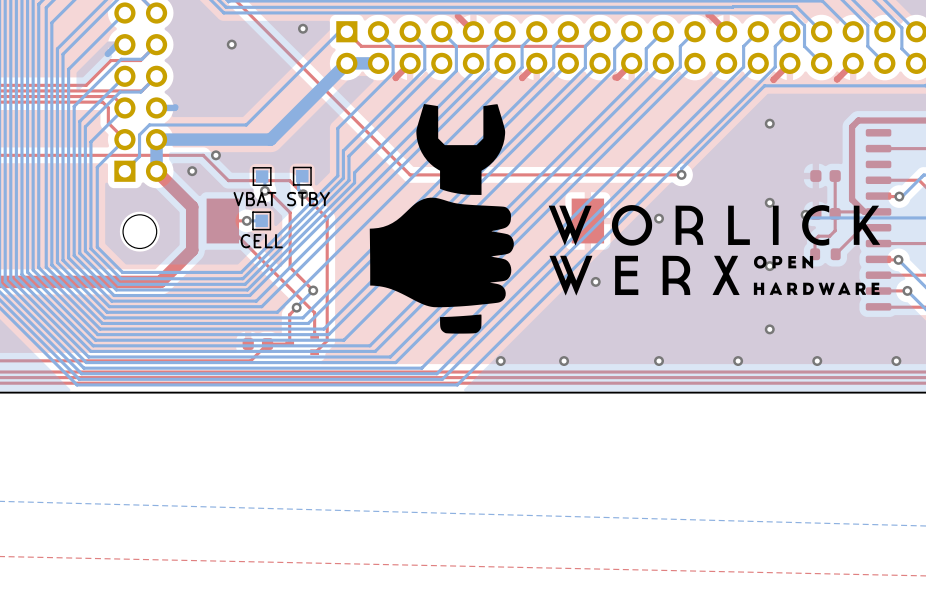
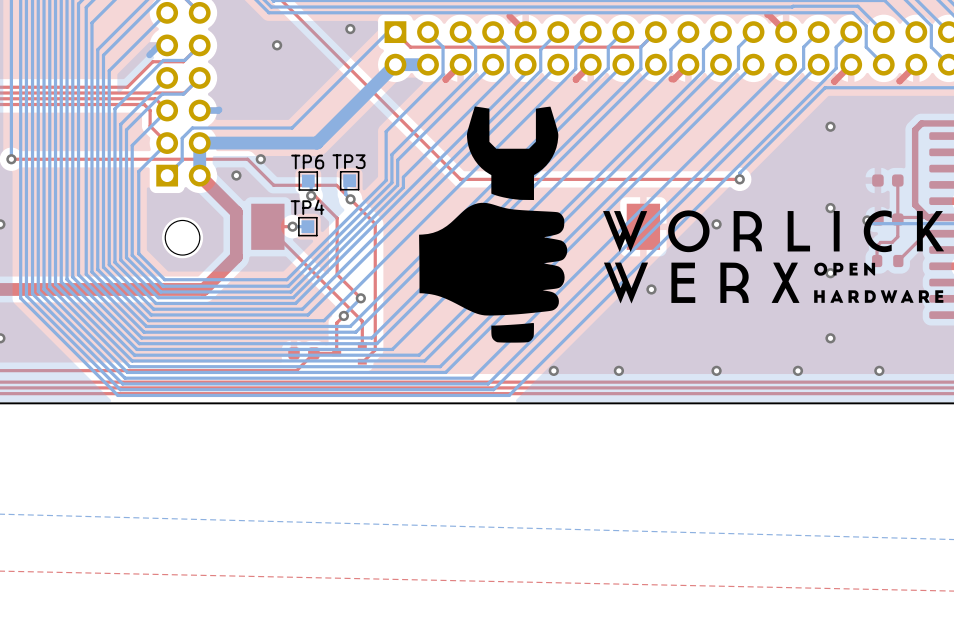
TP3 name: none -> TP3 (349, 161)
TP6 name: none -> TP6 (307, 162)
TP6 value: VBAT (254, 199) -> none
TP3 value: STBY (308, 199) -> none
TP4 name: none -> TP4 (307, 207)
TP4 value: CELL (261, 241) -> none

